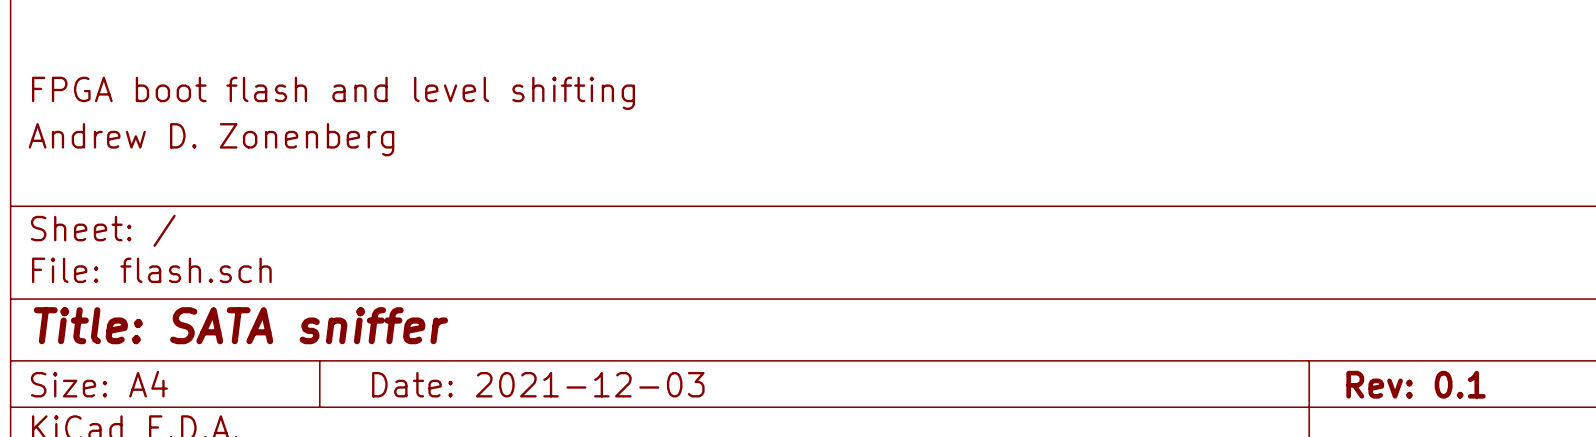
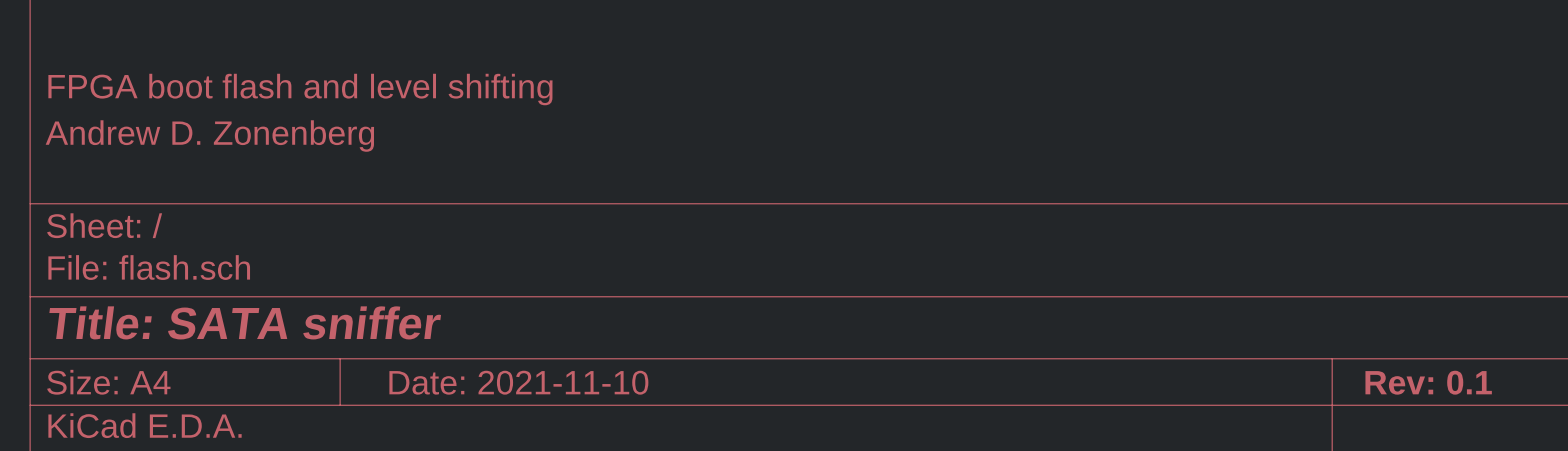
title block: Date: 2021-12-03 (538, 384) -> Date: 2021-11-10 (518, 382)

